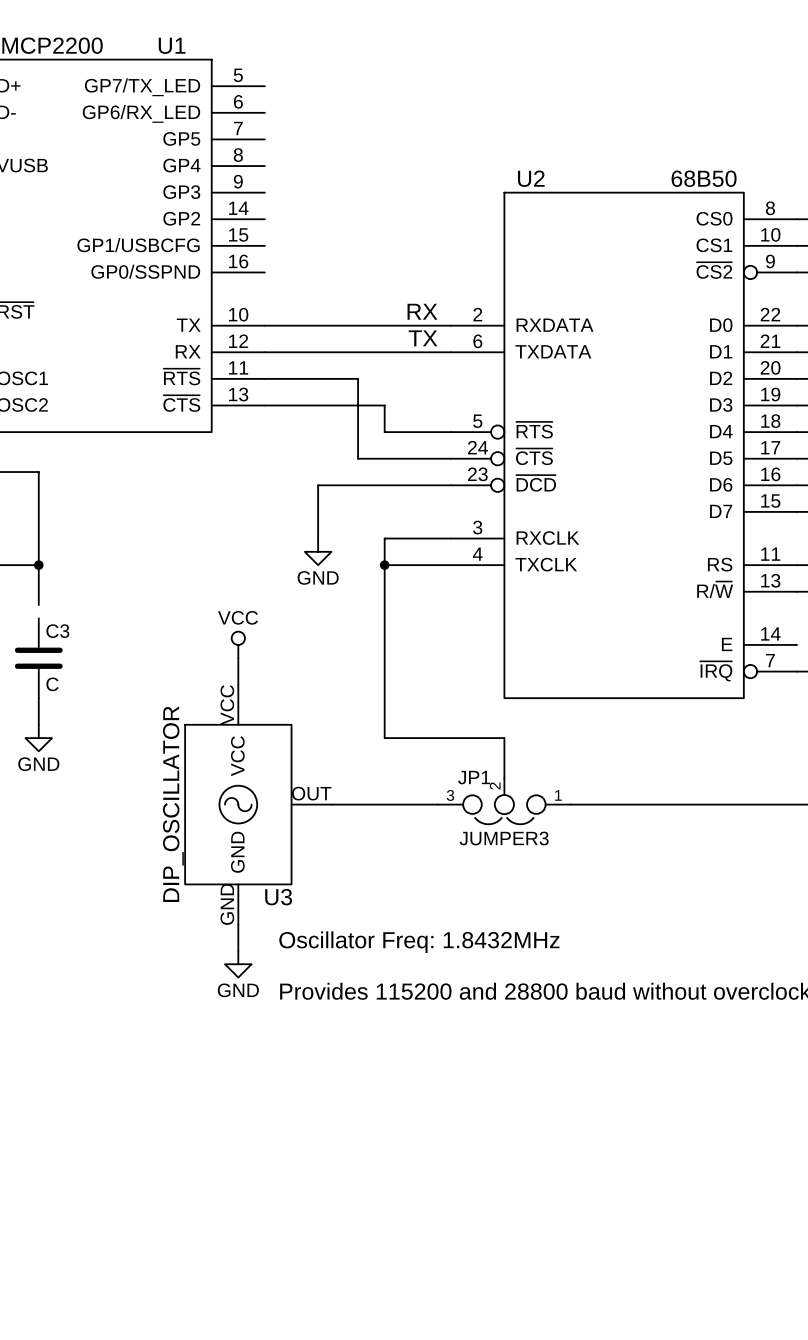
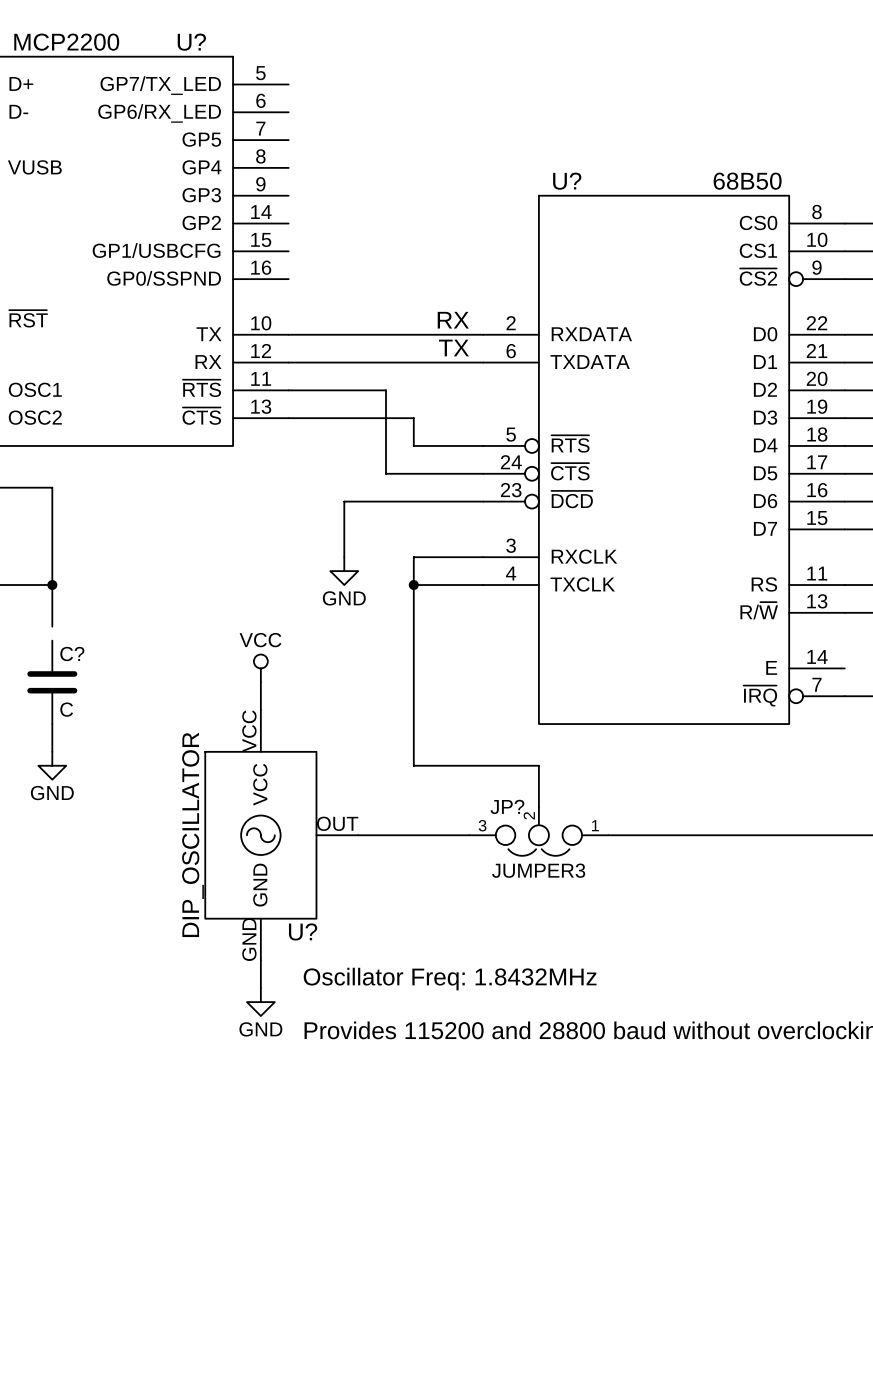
U1 name: U1 (172, 45) -> U? (191, 42)
U2 name: U2 (531, 178) -> U? (567, 181)
C3 name: C3 (57, 631) -> C? (72, 654)
JP1 name: JP1 (474, 777) -> JP? (507, 806)
U3 name: U3 (278, 897) -> U? (303, 931)

